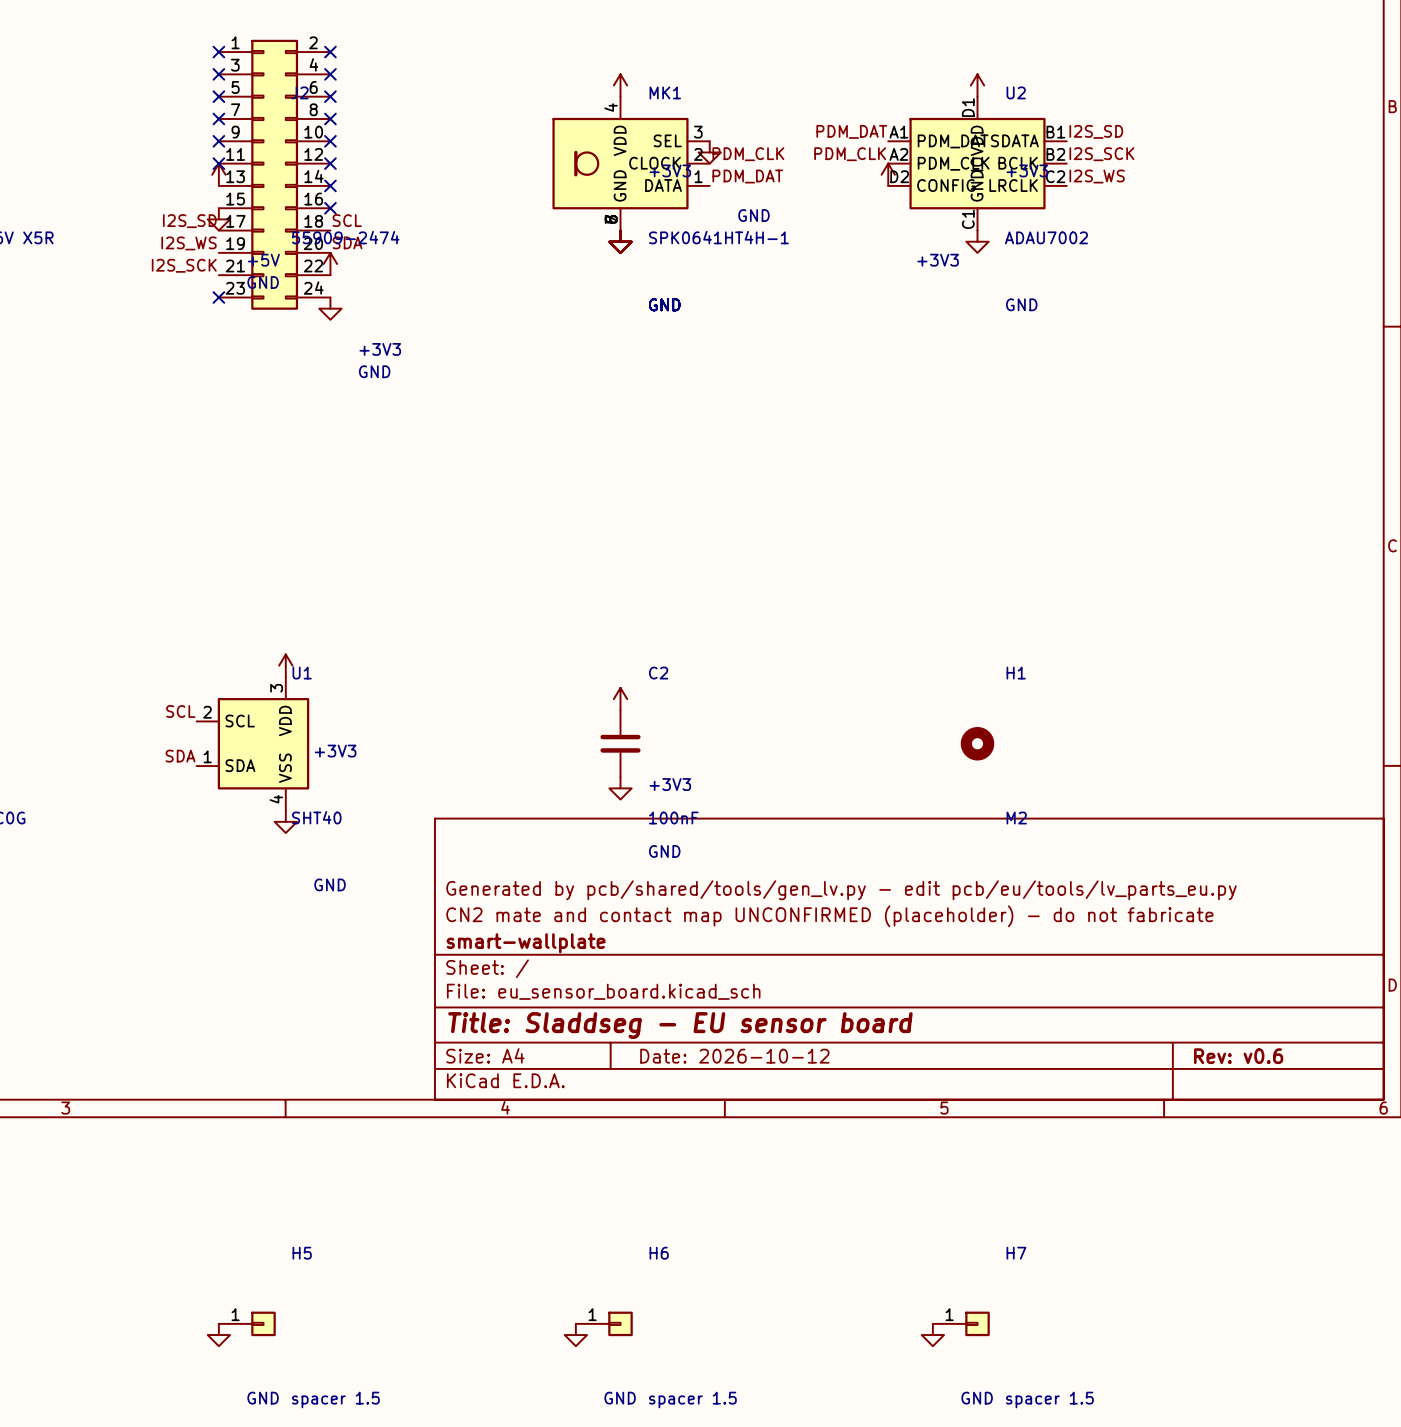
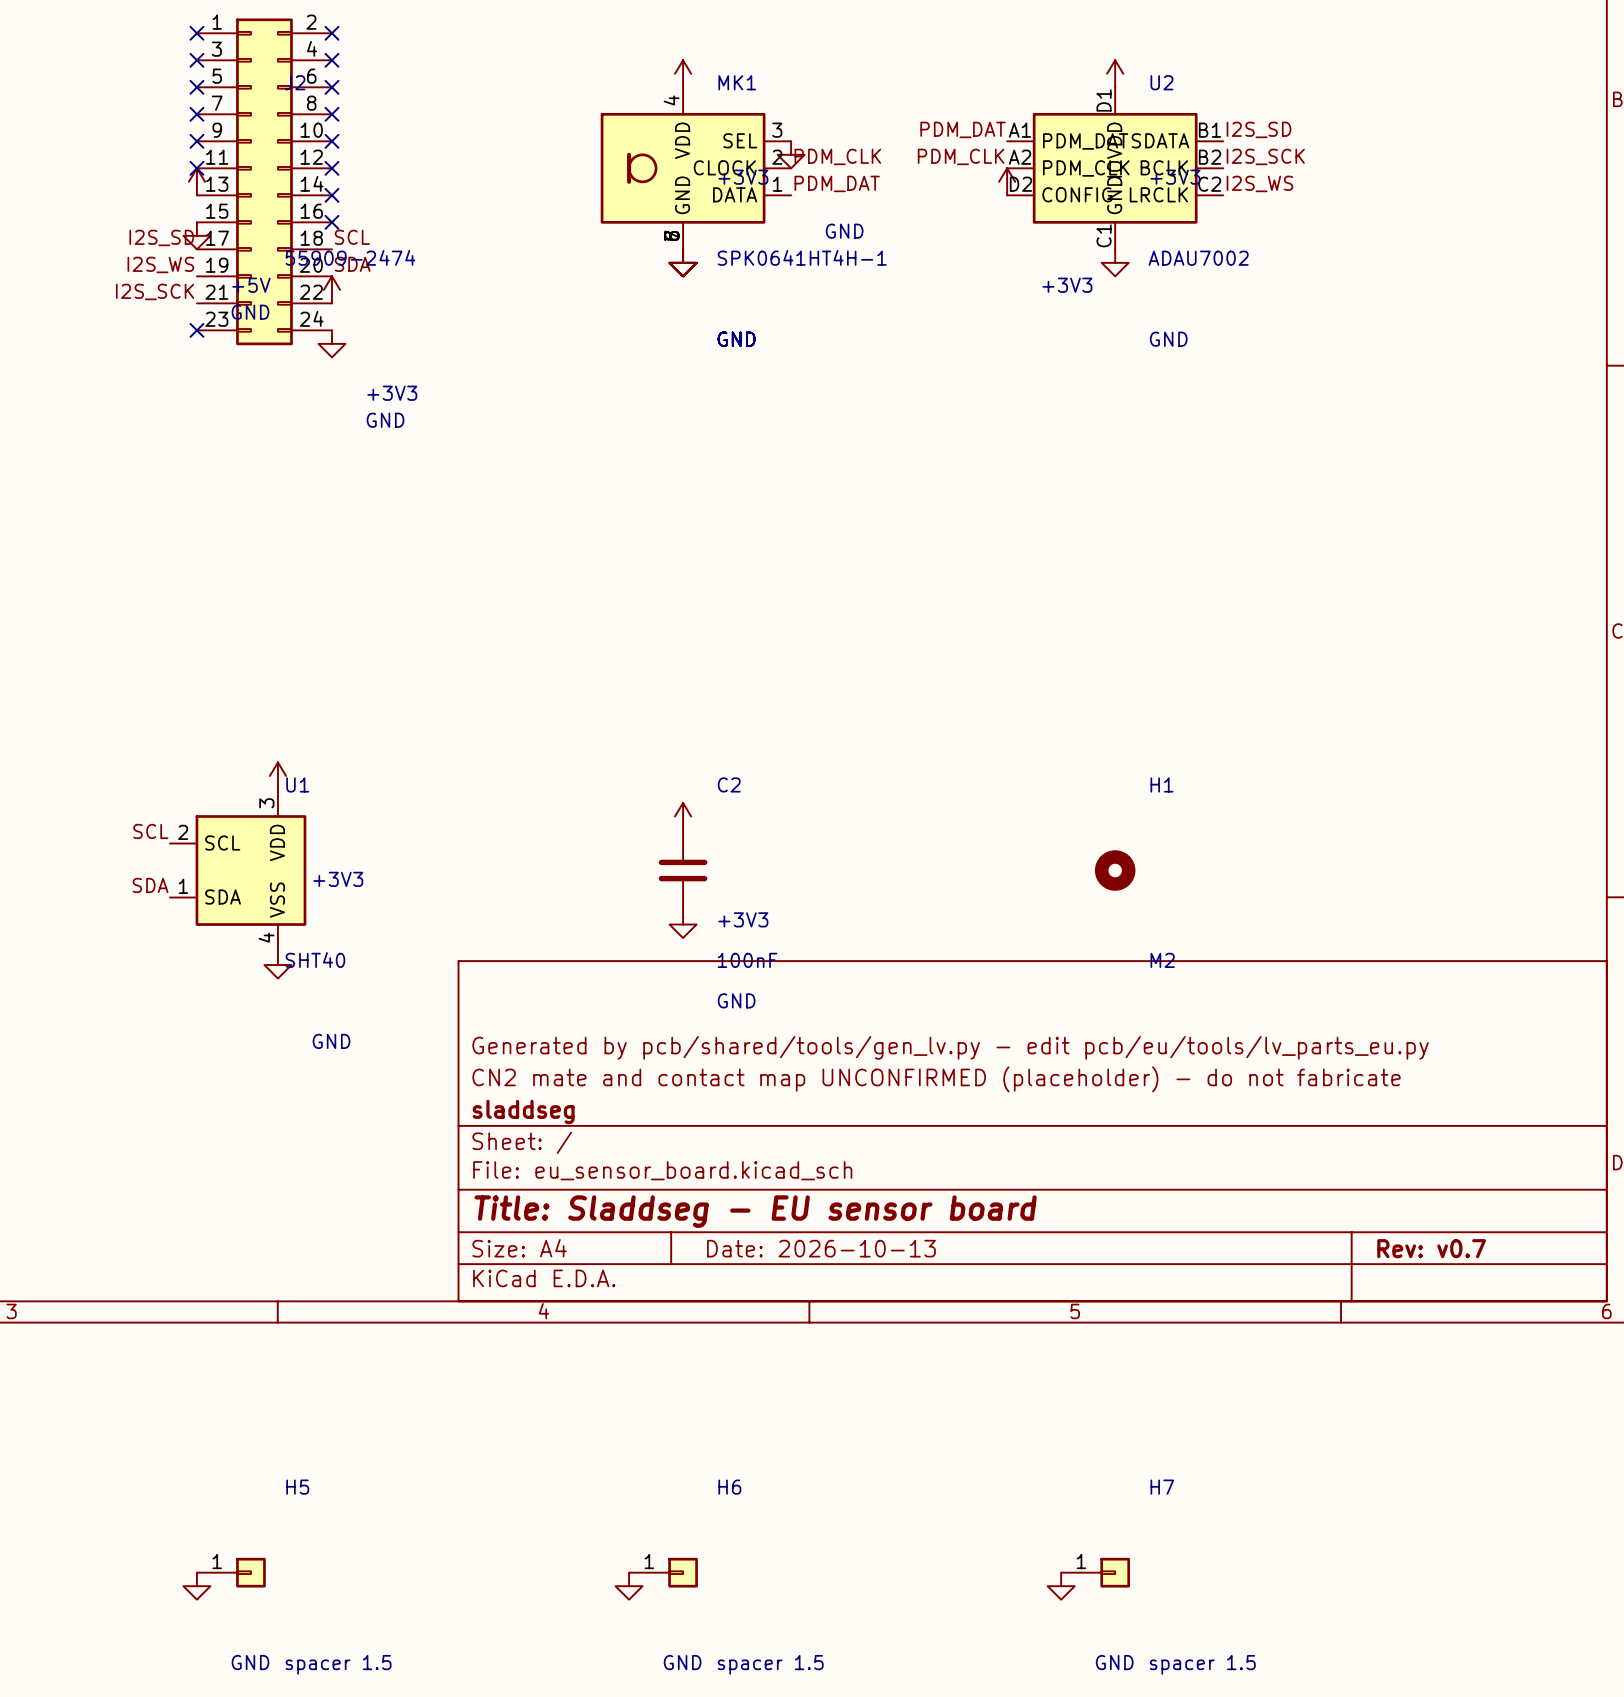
title block: smart-wallplate (526, 943) -> sladdseg (523, 1112)
title block: Date: 2026-10-12 (734, 1056) -> Date: 2026-10-13 (821, 1248)
title block: Rev: v0.6 (1238, 1056) -> Rev: v0.7 (1431, 1248)

